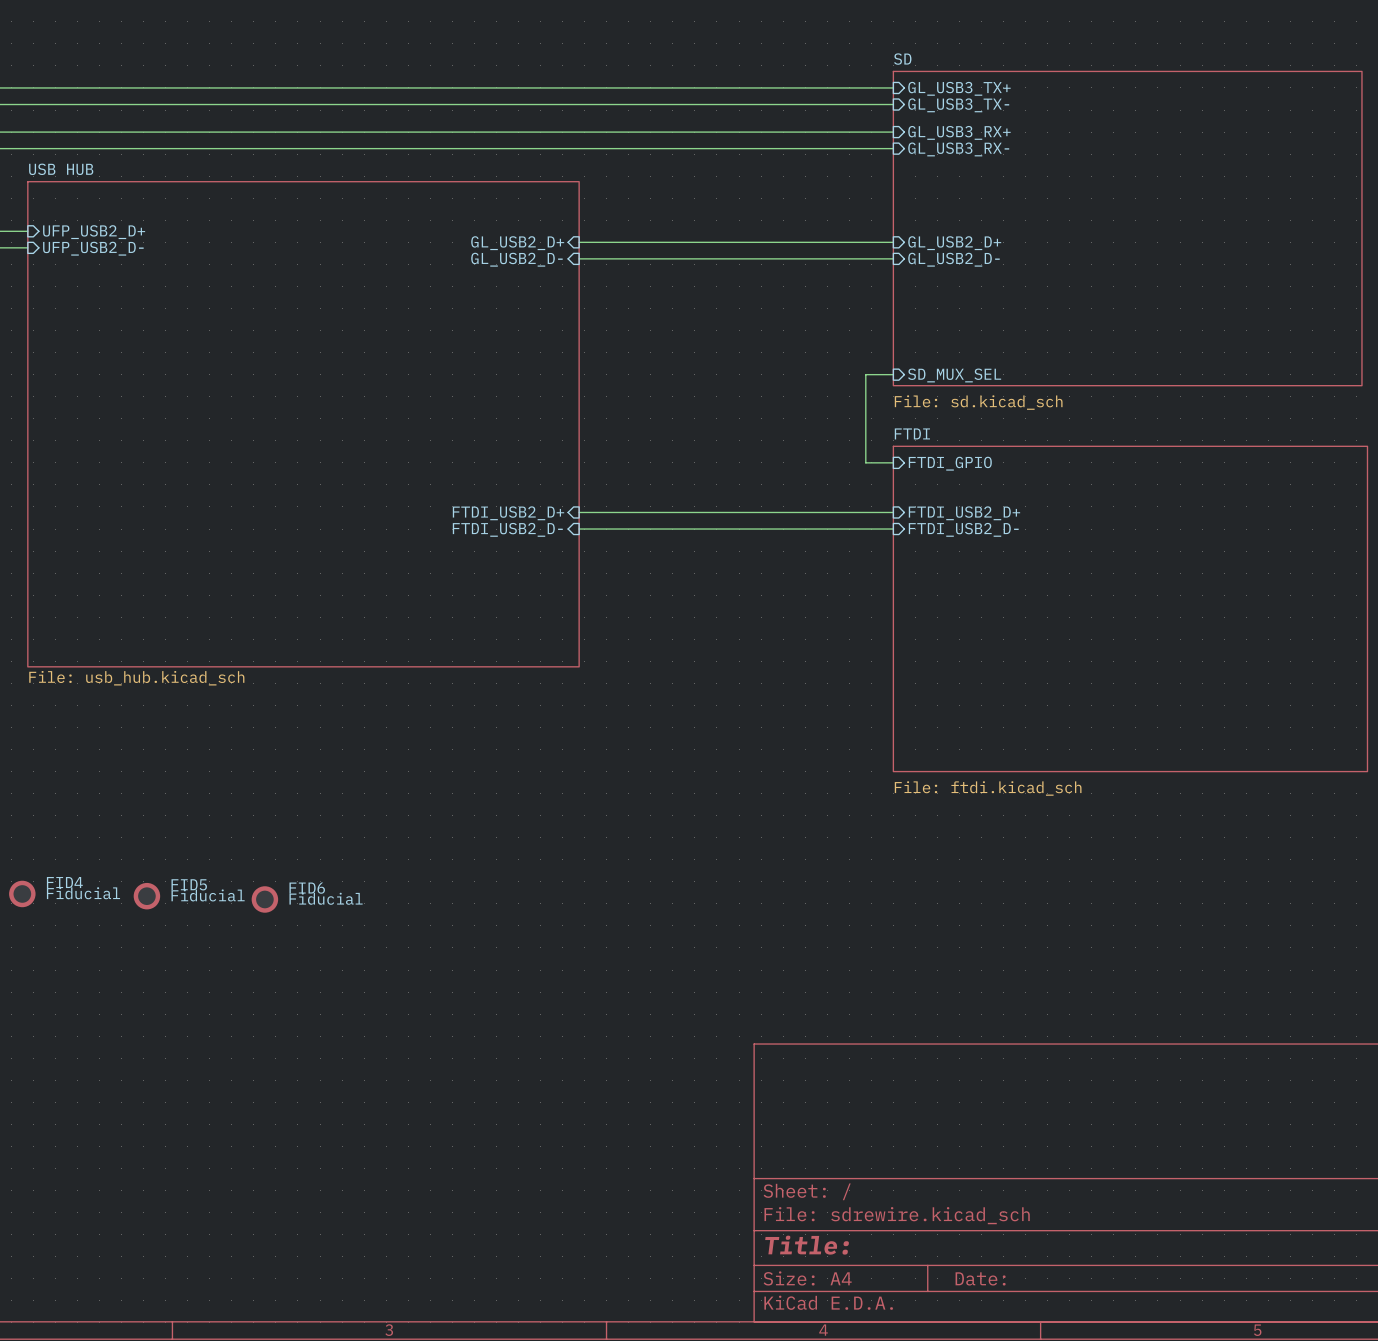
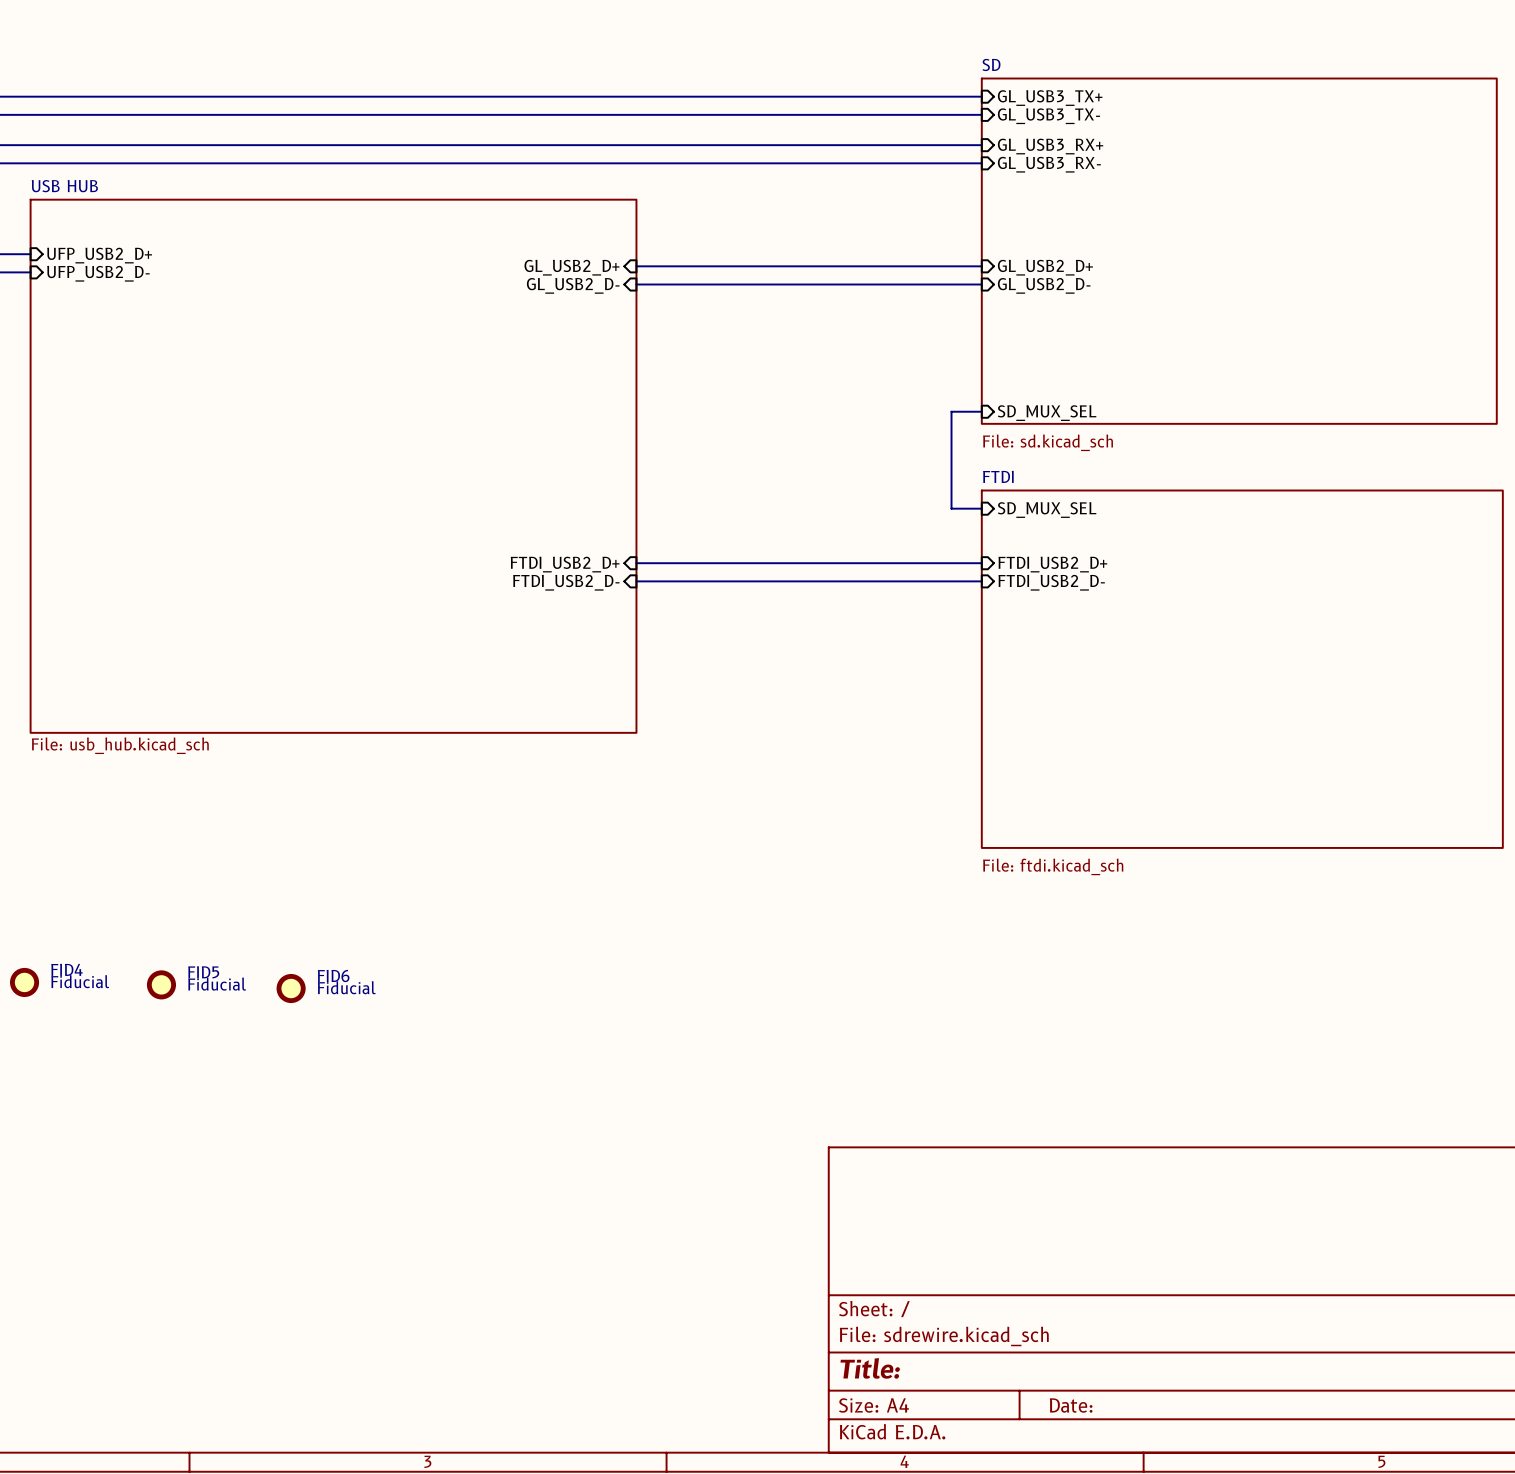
sheet pin: FTDI_GPIO (950, 463) -> SD_MUX_SEL (1047, 510)

